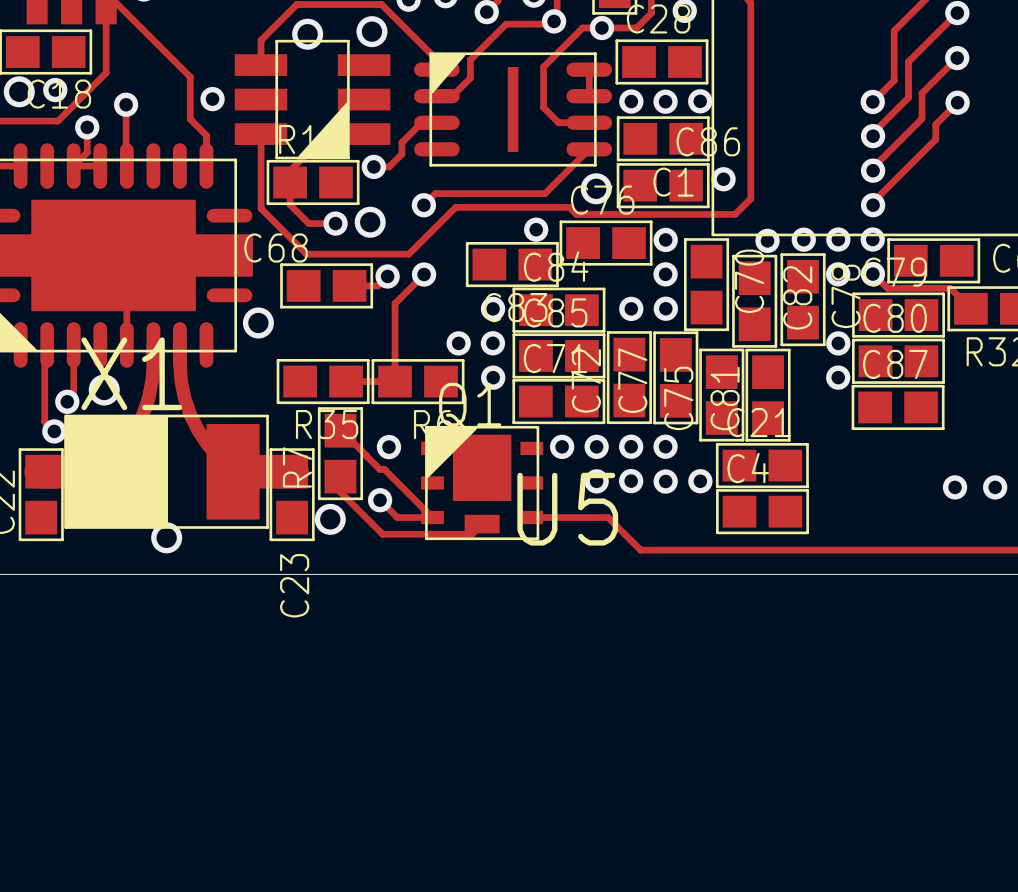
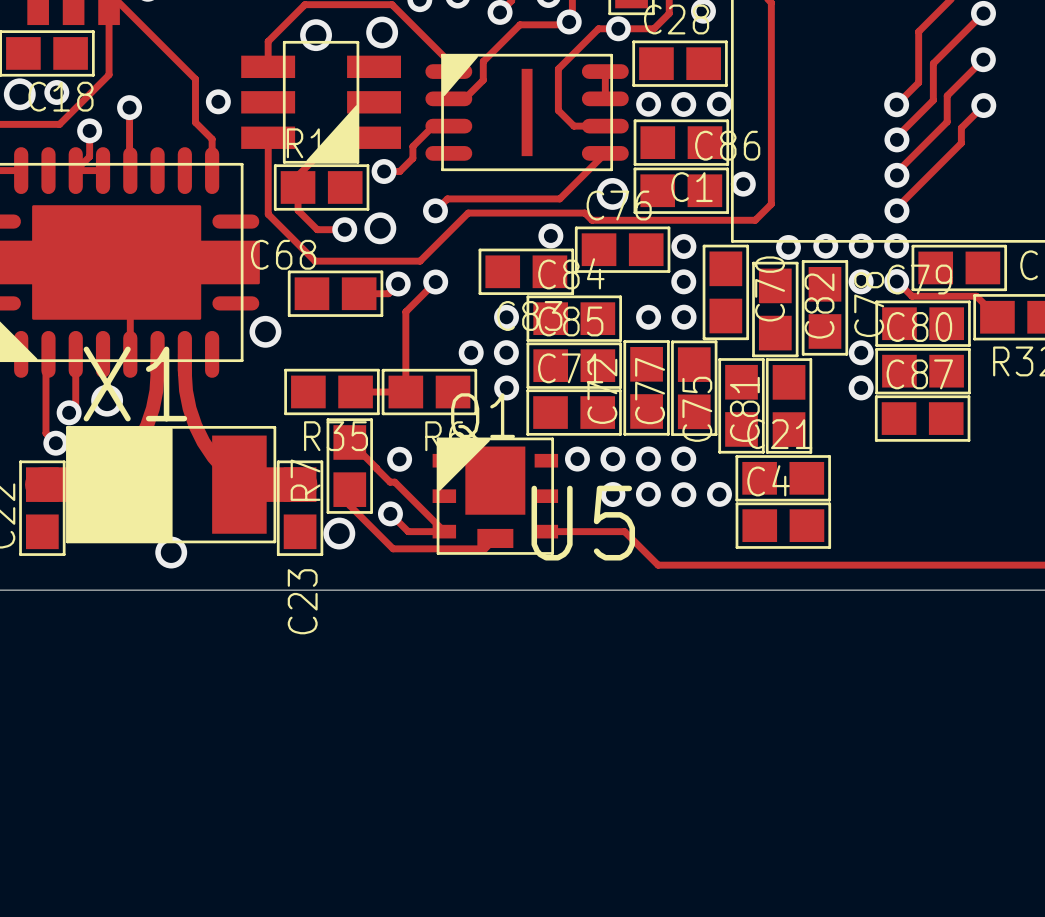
via: (955, 487) -> none
via: (995, 487) -> none

